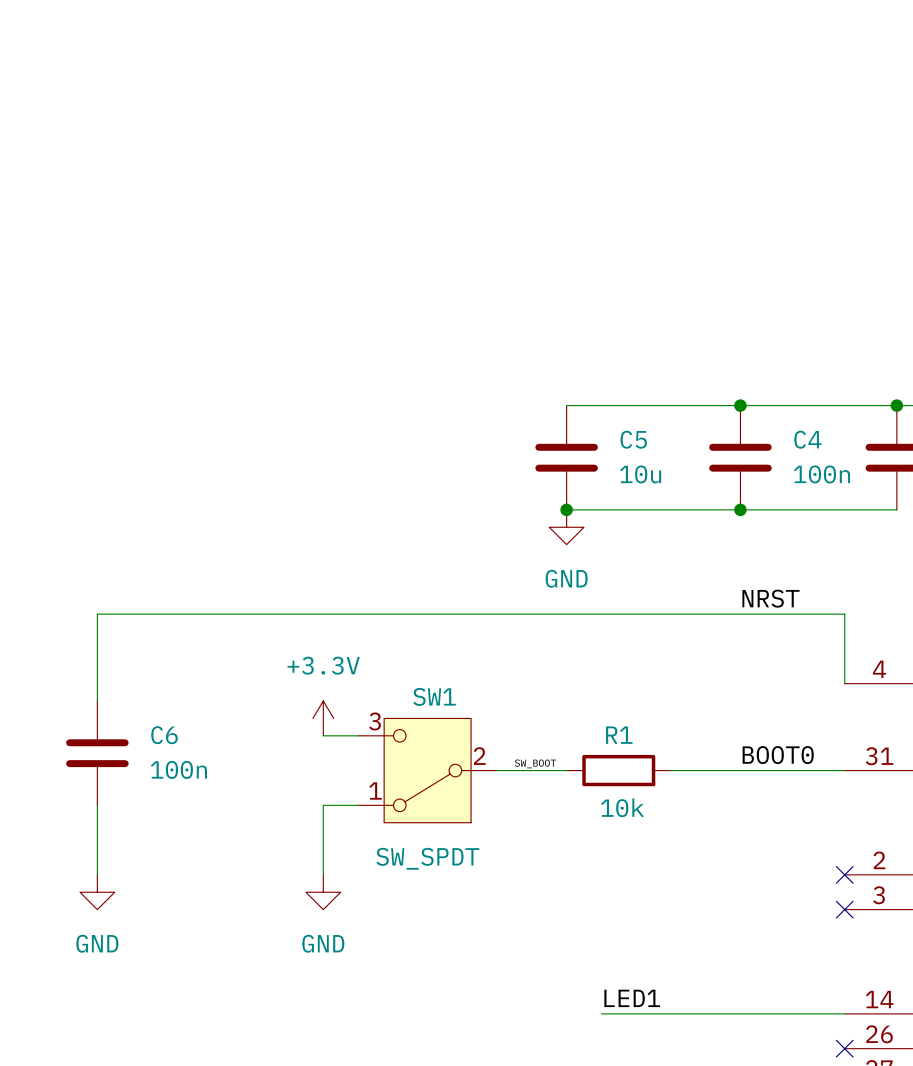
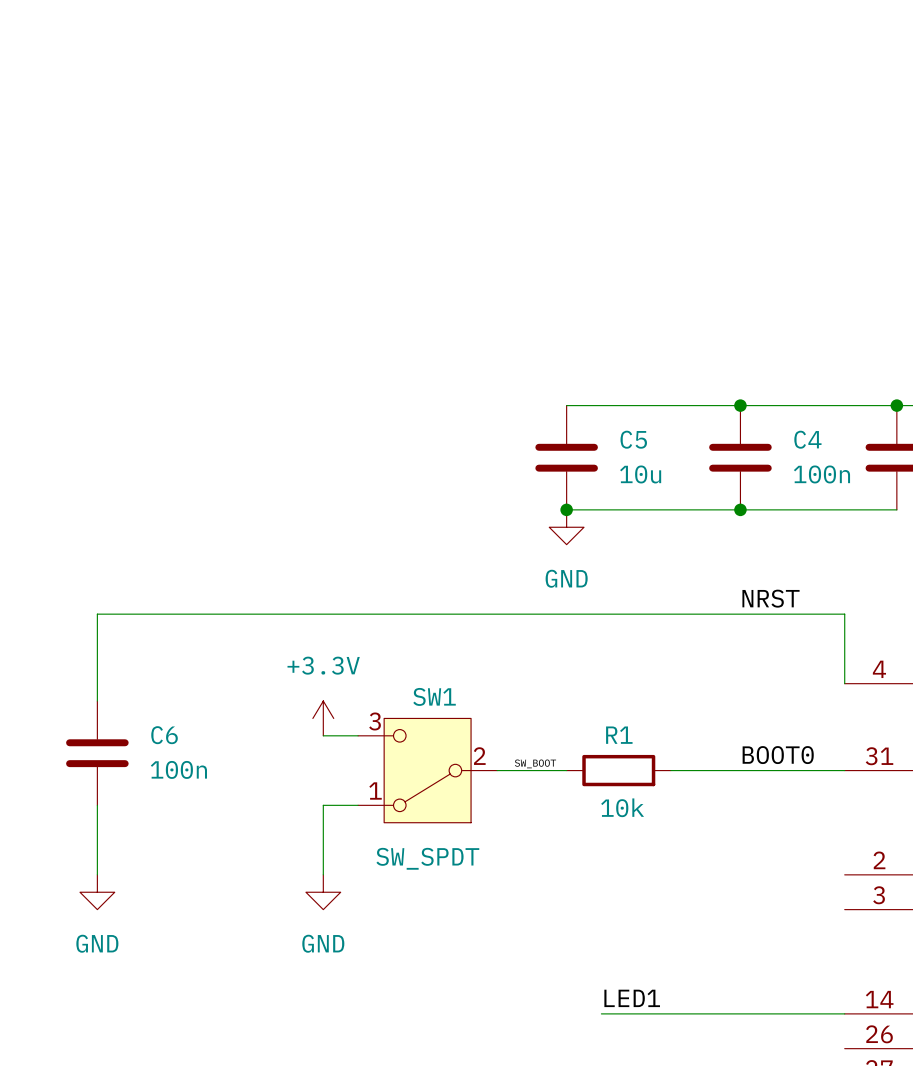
no-connect mark: (844, 874) -> none
no-connect mark: (844, 909) -> none
no-connect mark: (844, 1048) -> none

